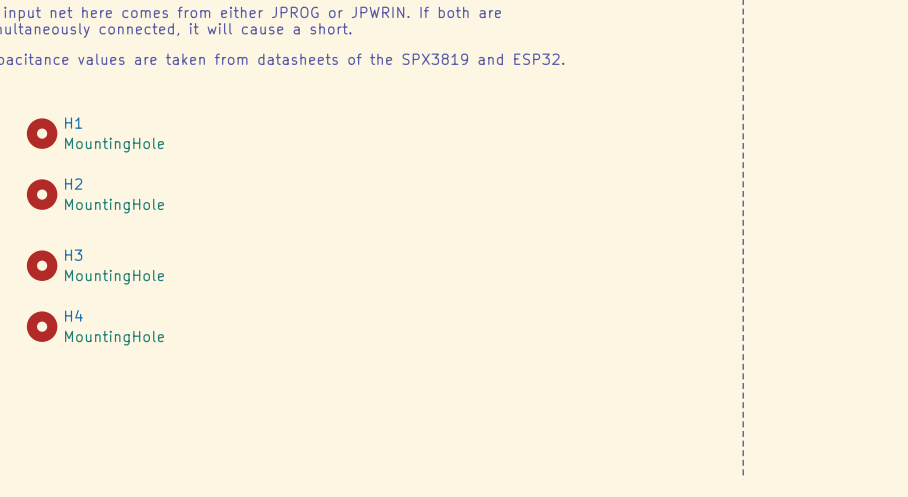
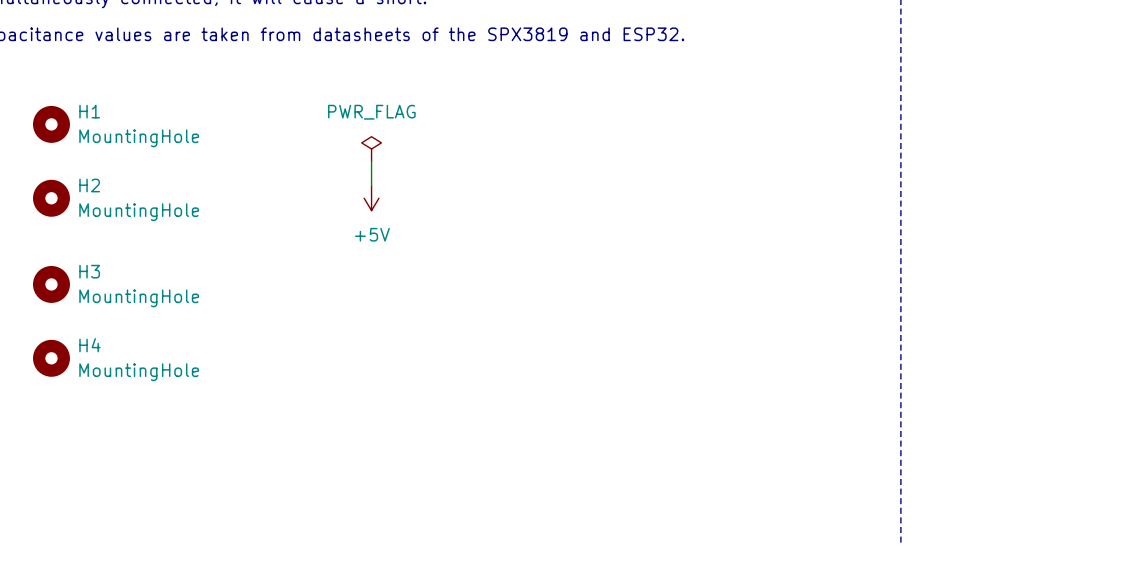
power symbol: none -> PWR_FLAG (371, 149)
wire: none -> (371, 161) (371, 185)
power symbol: none -> +5V (371, 198)

